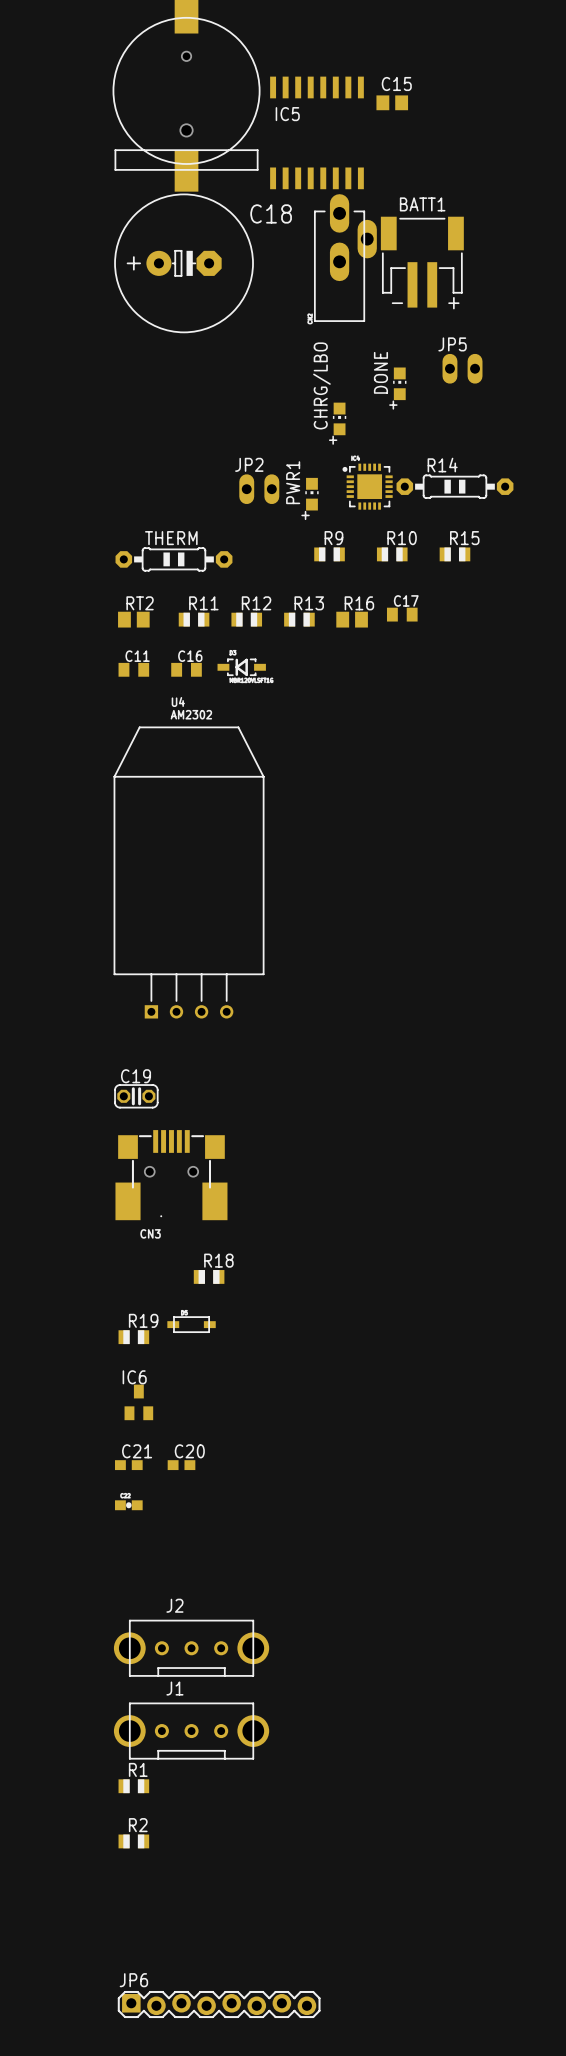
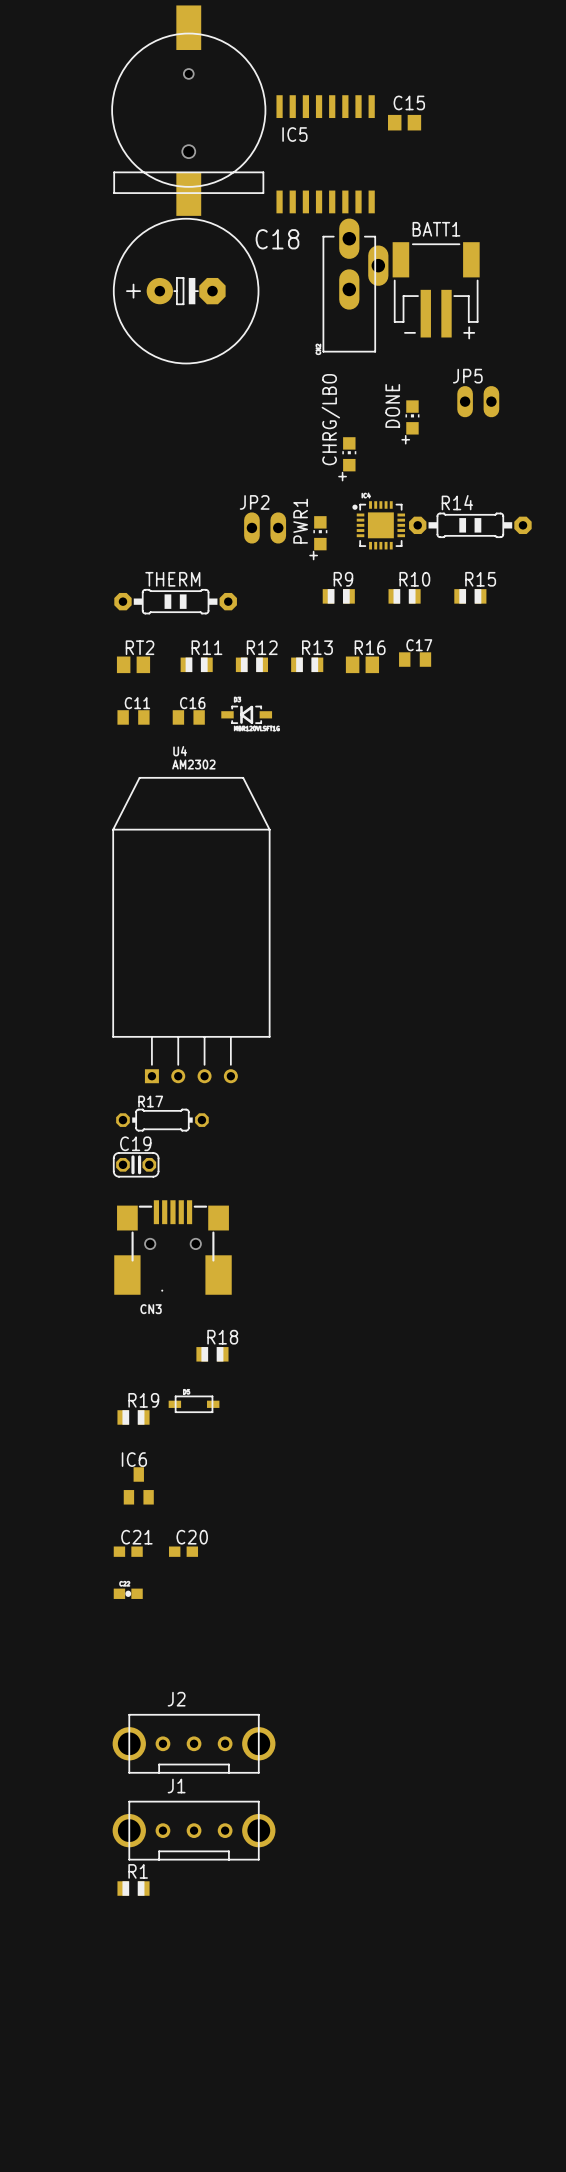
R17: none -> (162, 1120)
R2: (133, 1841) -> none
JP6: (219, 2004) -> none

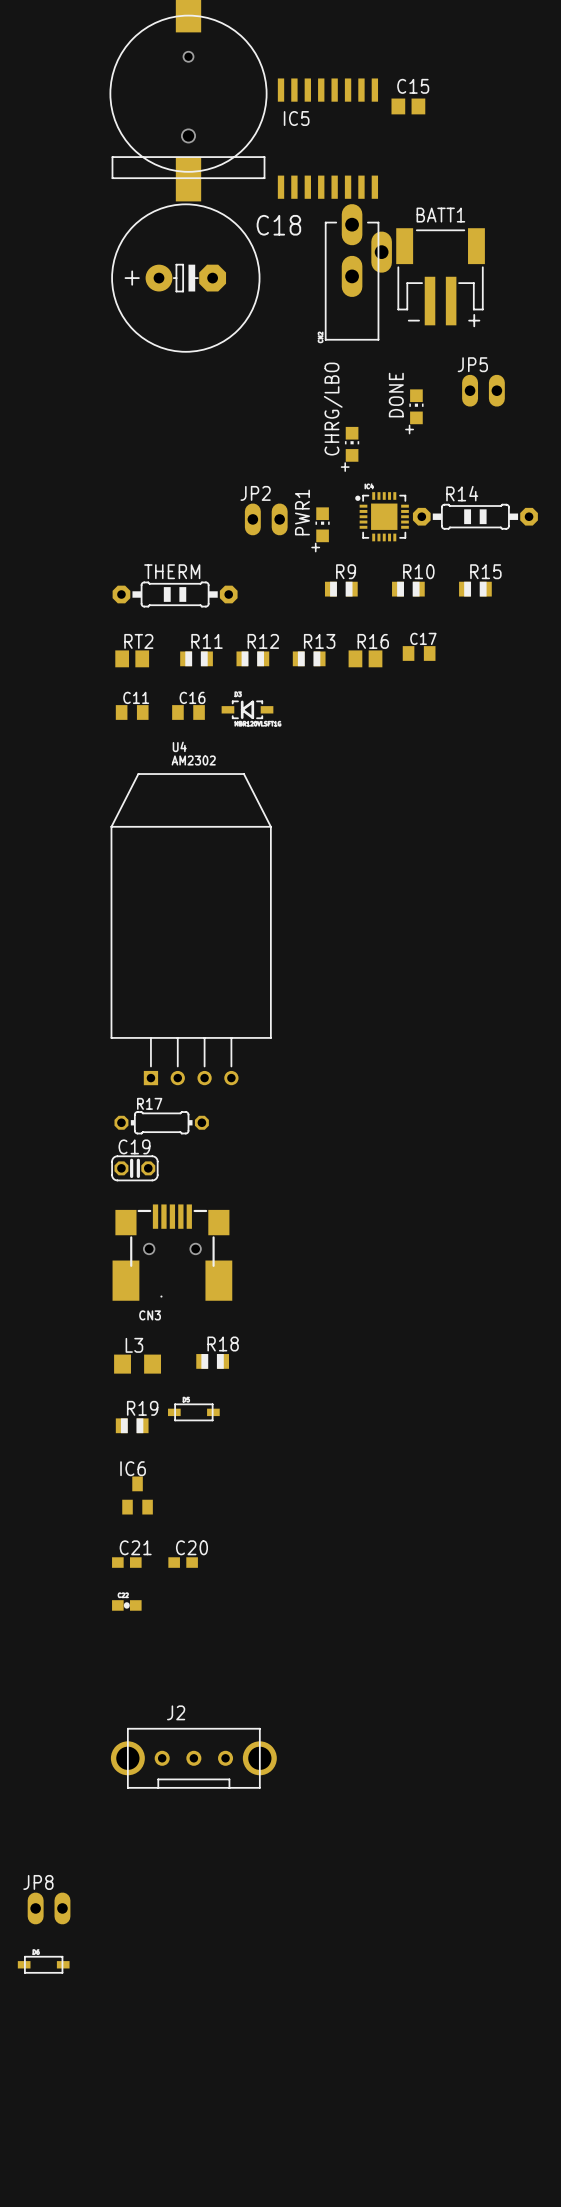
L3: none -> (137, 1364)
J1: (194, 1830) -> none
R1: (133, 1888) -> none
JP8: none -> (49, 1908)
part: none -> (43, 1964)

